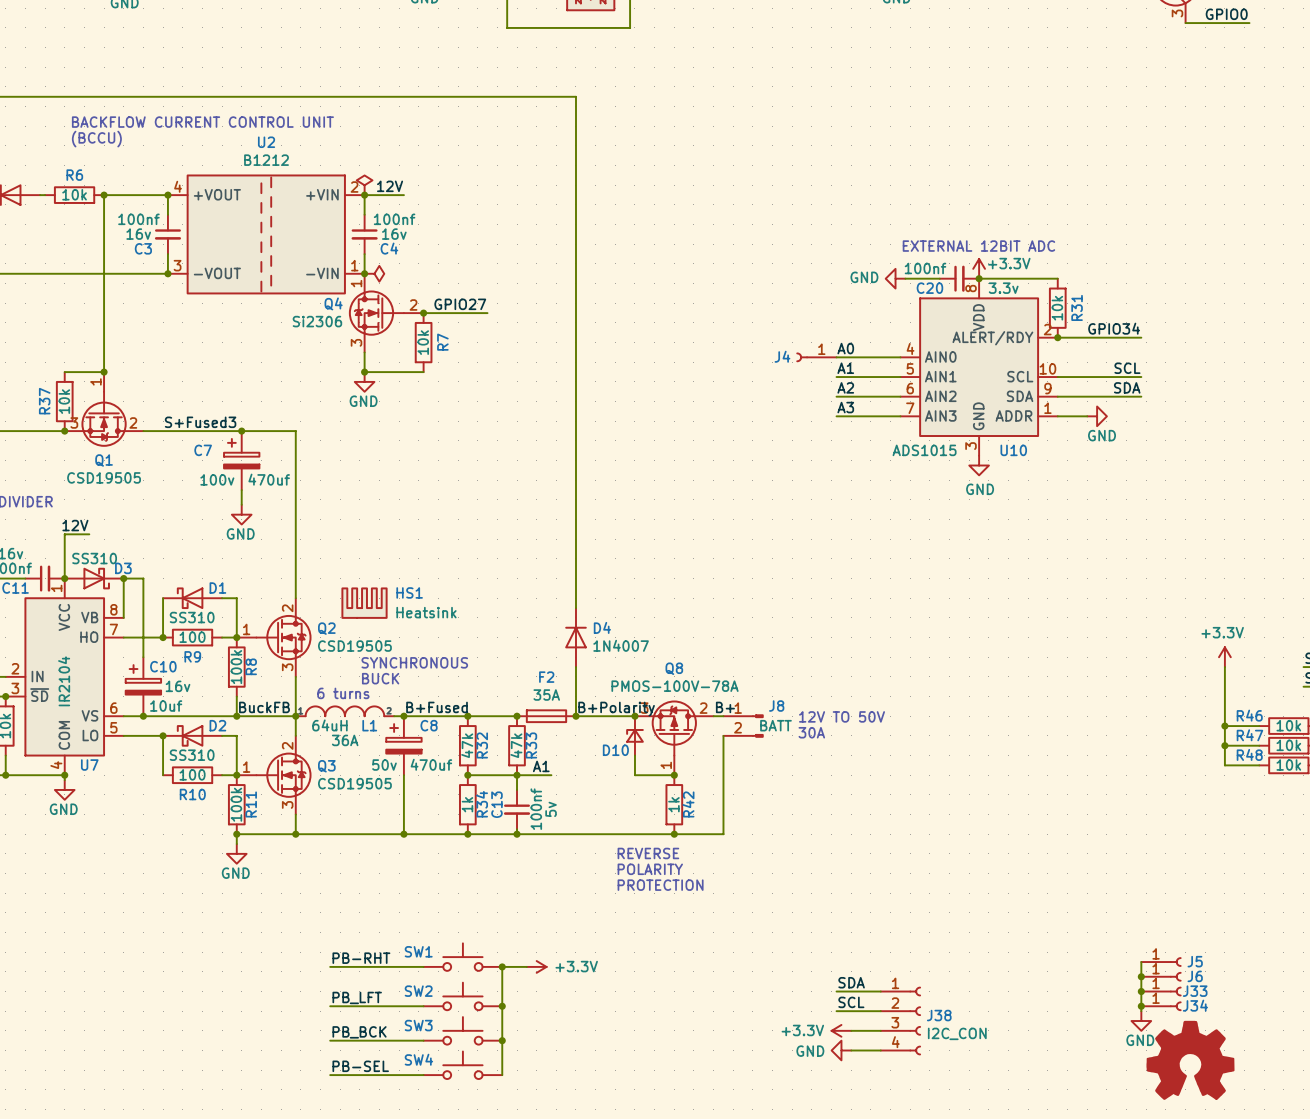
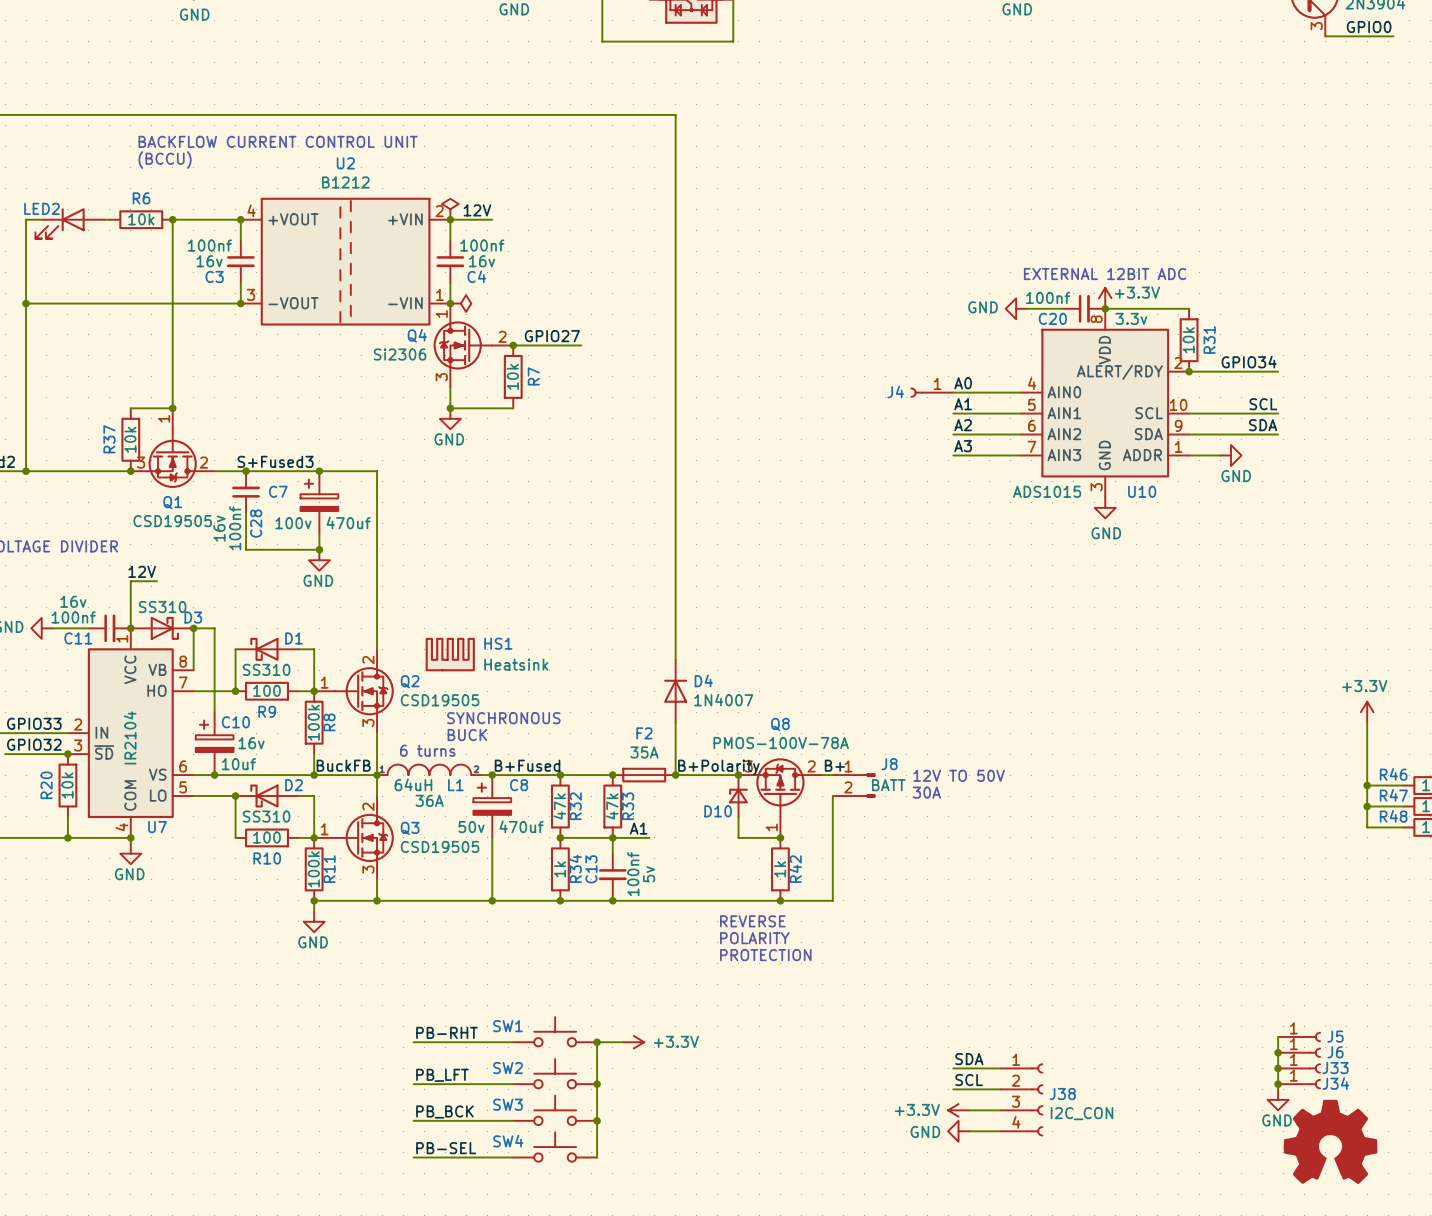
junction: none -> (246, 471)
C28: none -> 100nf (246, 492)
wire: none -> (246, 513) (246, 549) (319, 549)
junction: none -> (319, 549)

